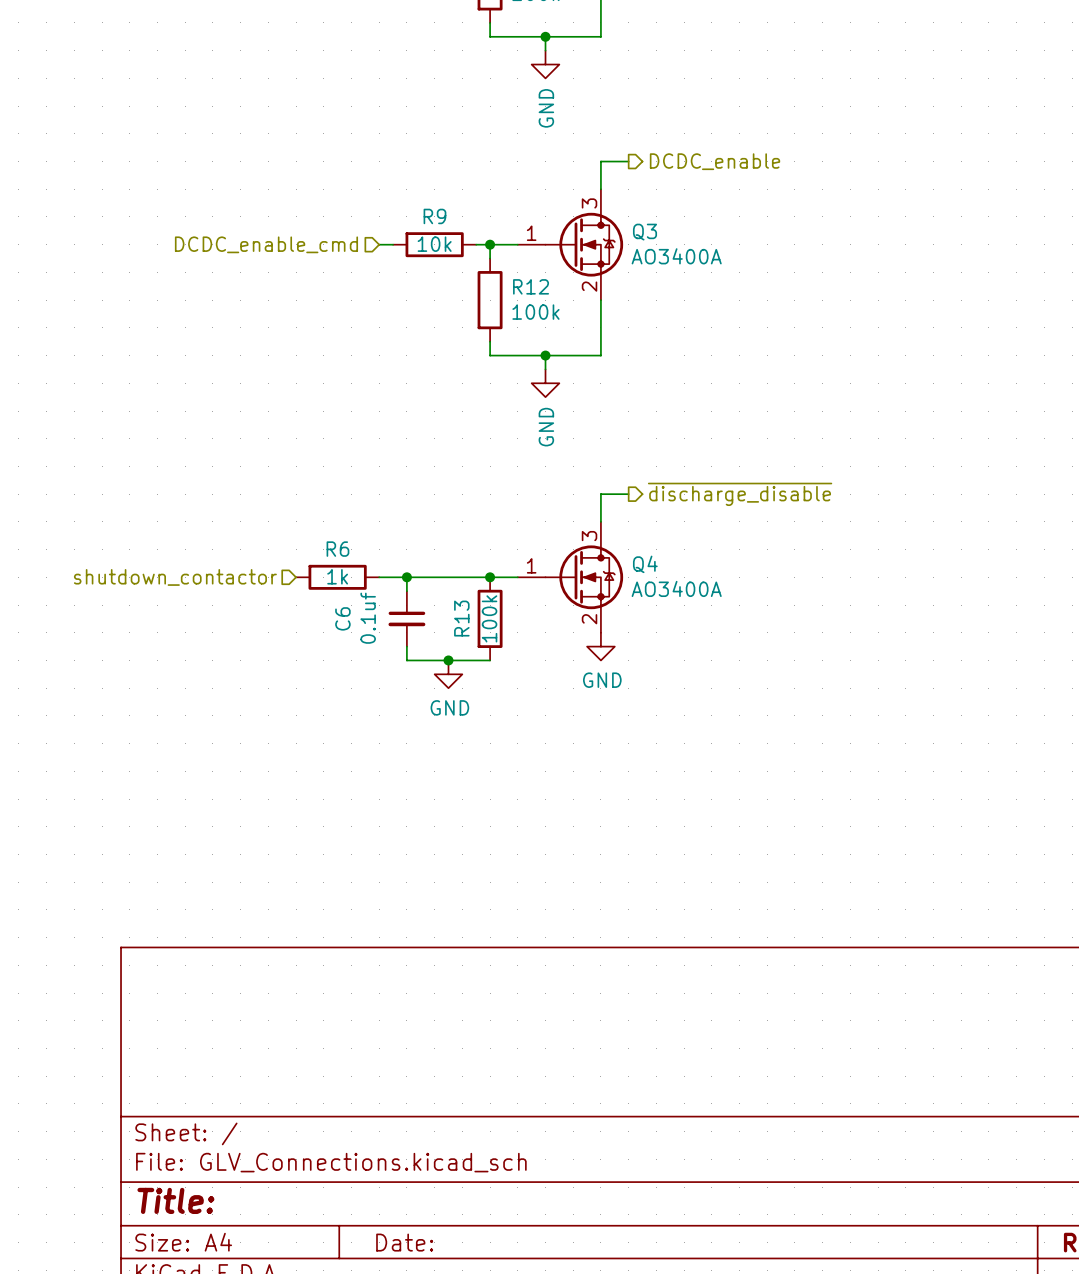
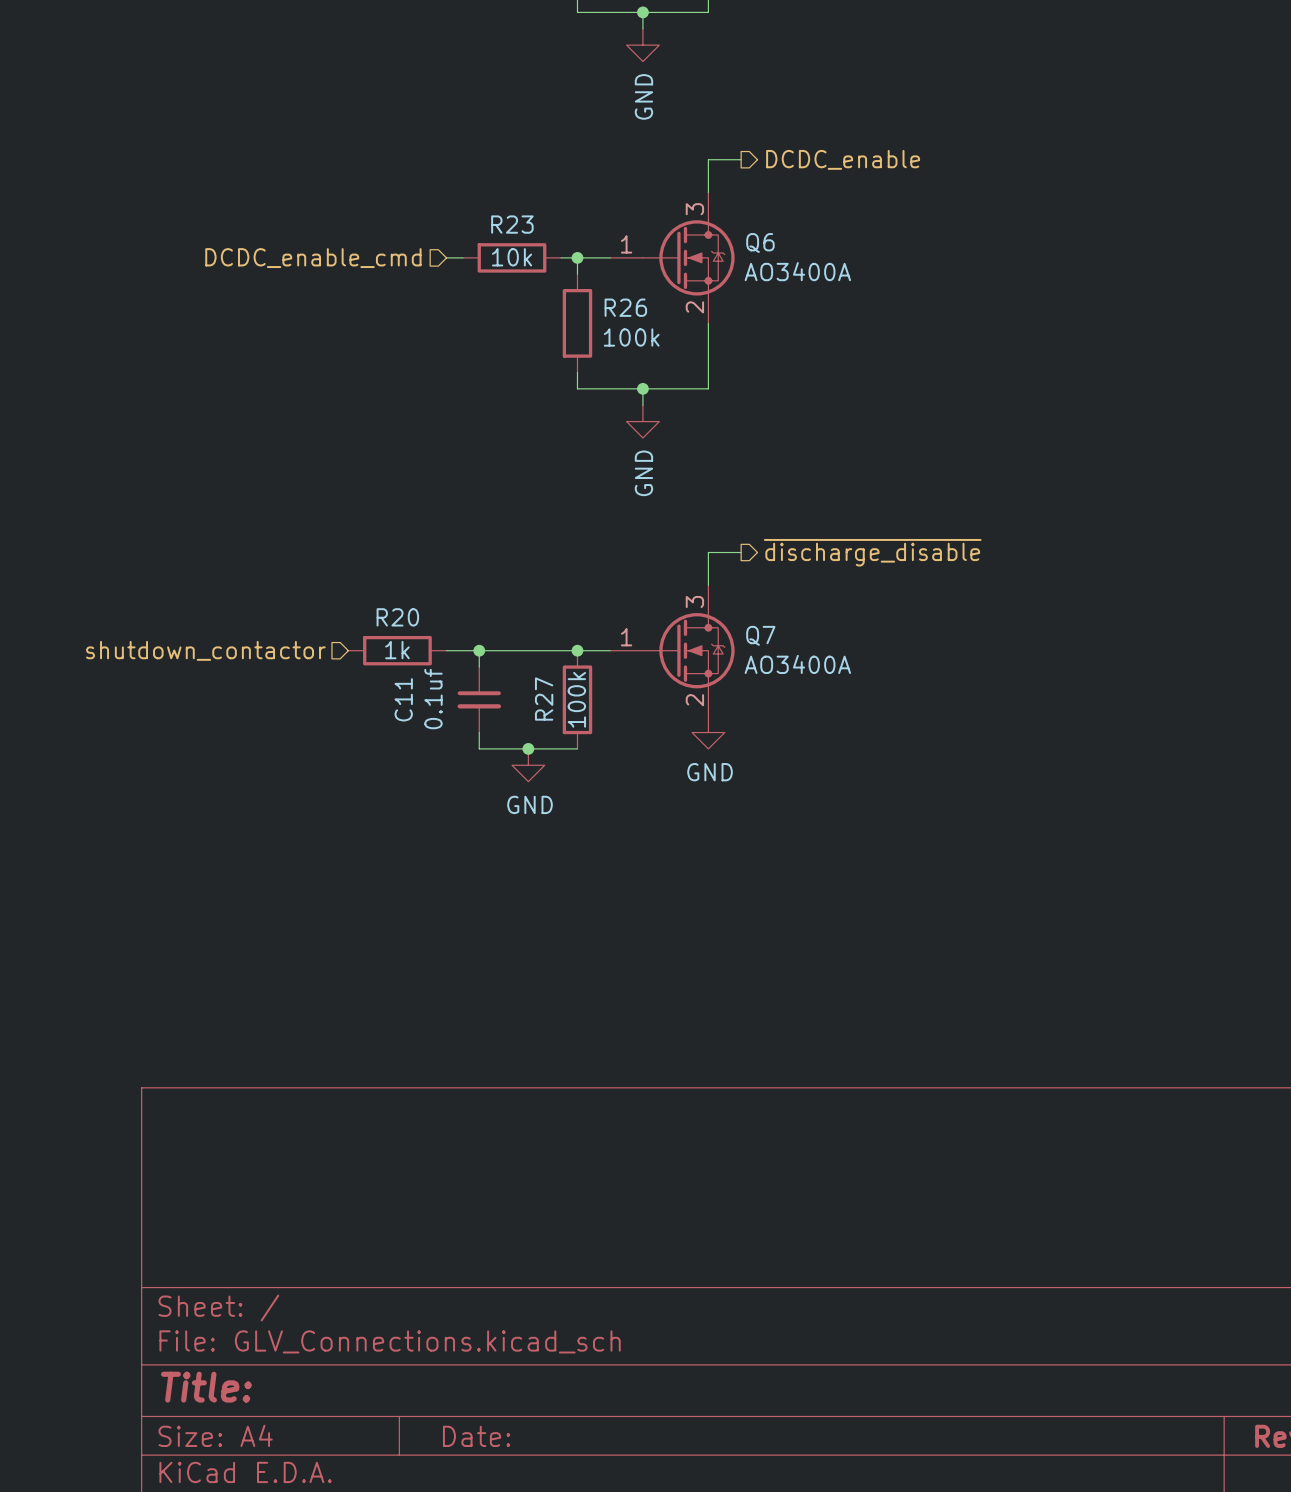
R9 name: R9 (434, 216) -> R23 (512, 224)
Q3 name: Q3 (645, 232) -> Q6 (760, 243)
R12 name: R12 (531, 286) -> R26 (625, 307)
R6 name: R6 (337, 549) -> R20 (397, 617)
Q4 name: Q4 (645, 564) -> Q7 (760, 635)
C6 name: C6 (342, 618) -> C11 (403, 699)
R13 name: R13 (461, 618) -> R27 (544, 699)

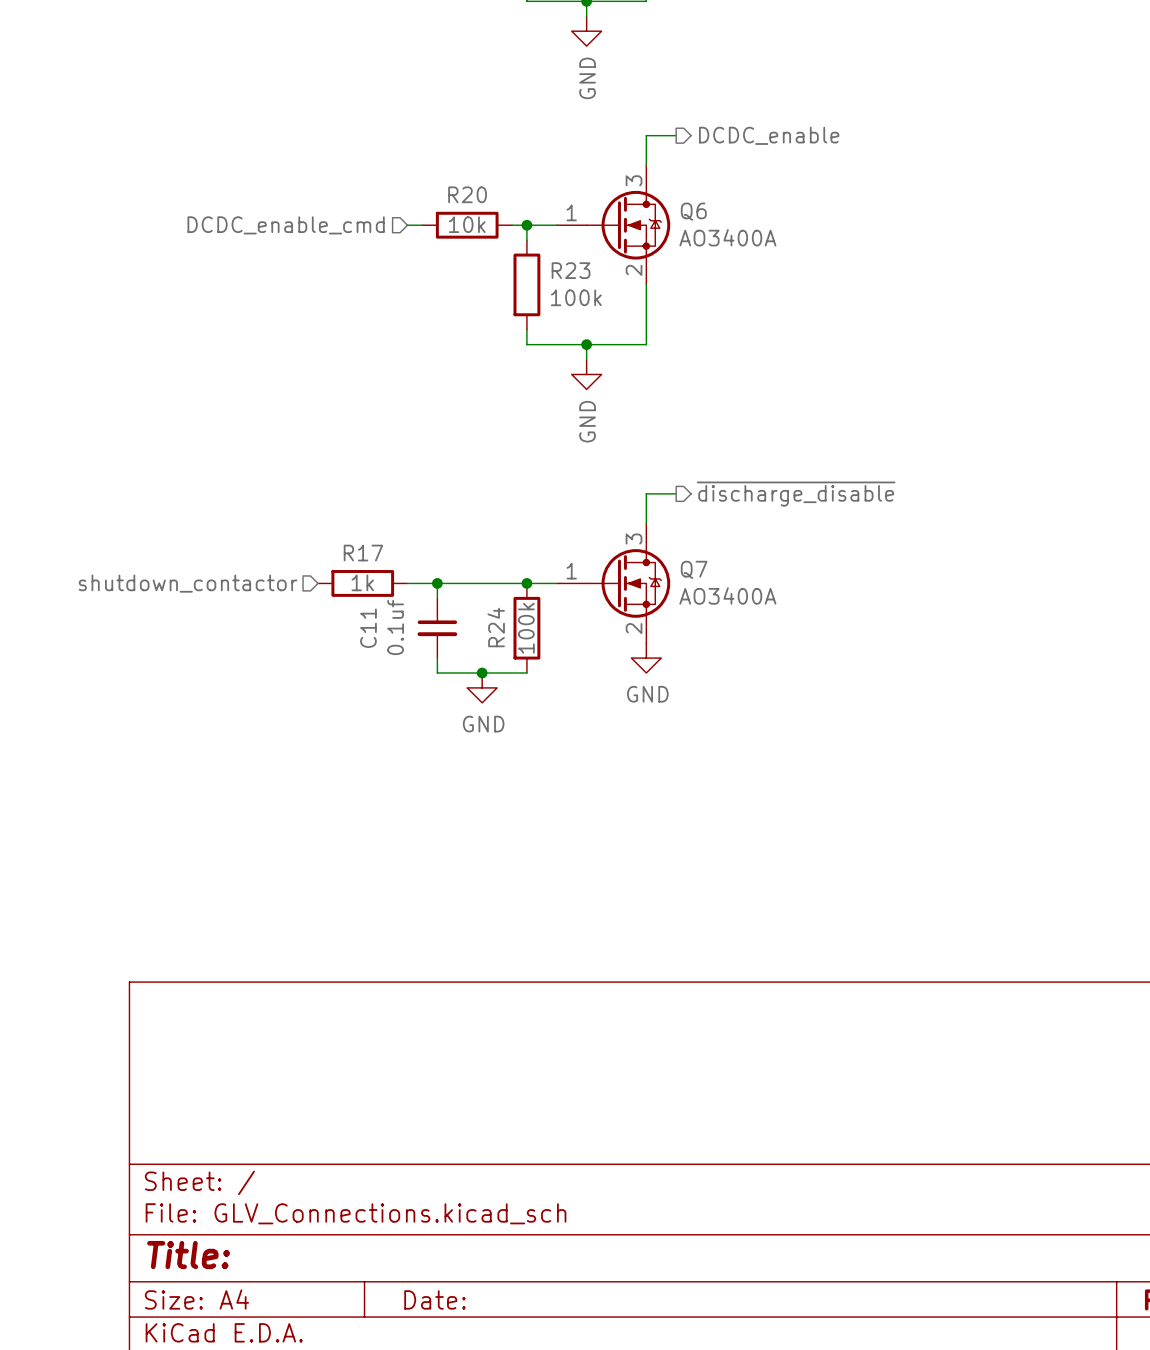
R23 name: R23 (512, 224) -> R20 (467, 194)
R26 name: R26 (625, 307) -> R23 (571, 270)
R20 name: R20 (397, 617) -> R17 (363, 553)
R27 name: R27 (544, 699) -> R24 (496, 627)

